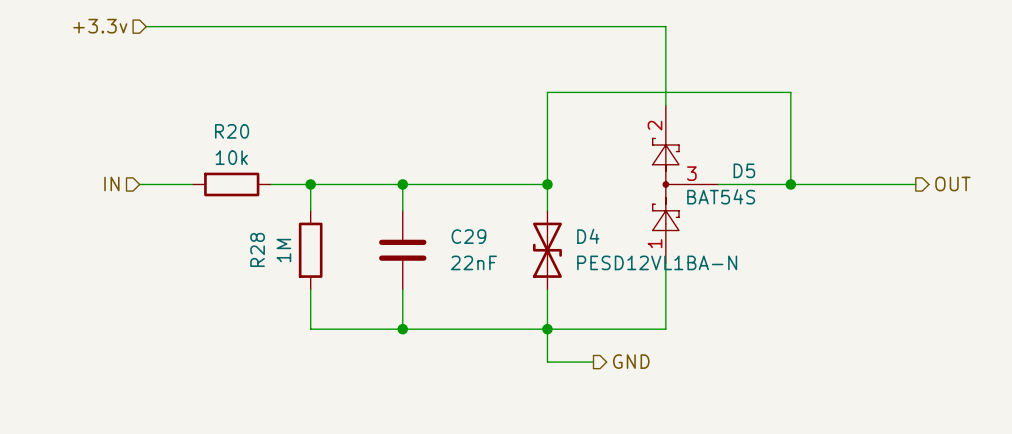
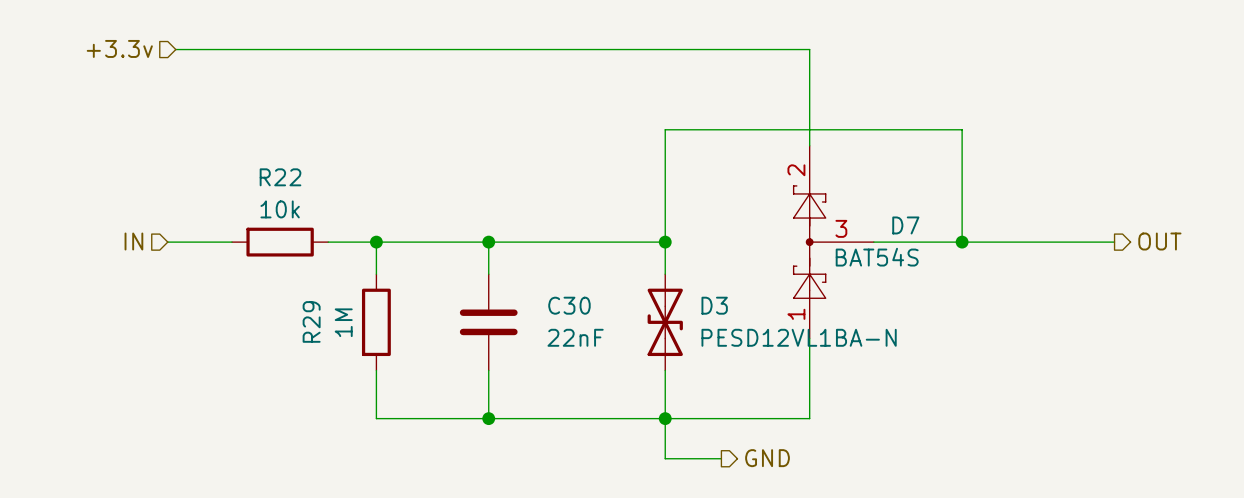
R20 name: R20 (232, 131) -> R22 (280, 177)
D5 name: D5 (744, 170) -> D7 (905, 225)
C29 name: C29 (468, 236) -> C30 (569, 305)
D4 name: D4 (588, 236) -> D3 (714, 305)
R28 name: R28 (257, 249) -> R29 (311, 321)

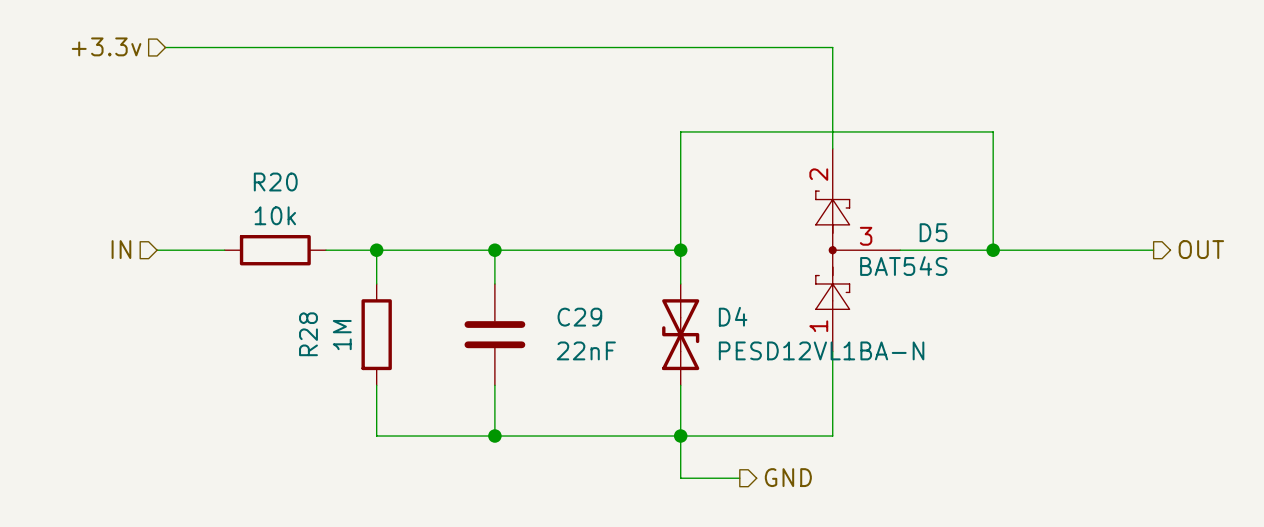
R22 name: R22 (280, 177) -> R20 (275, 182)
D7 name: D7 (905, 225) -> D5 (933, 232)
C30 name: C30 (569, 305) -> C29 (579, 317)
D3 name: D3 (714, 305) -> D4 (733, 316)
R29 name: R29 (311, 321) -> R28 (308, 334)

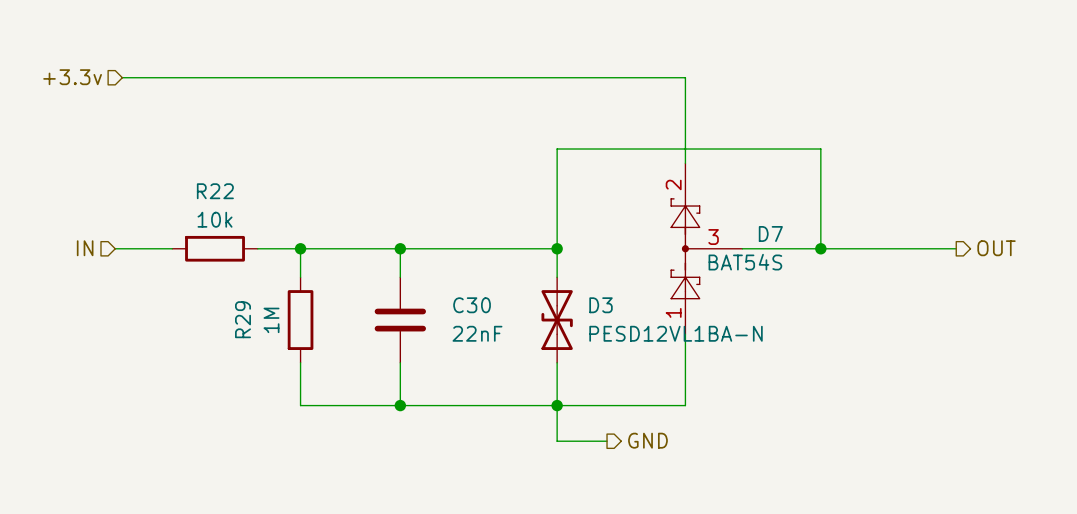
R20 name: R20 (275, 182) -> R22 (215, 191)
D5 name: D5 (933, 232) -> D7 (770, 233)
D4 name: D4 (733, 316) -> D3 (601, 305)
C29 name: C29 (579, 317) -> C30 (472, 305)
R28 name: R28 (308, 334) -> R29 (243, 319)

